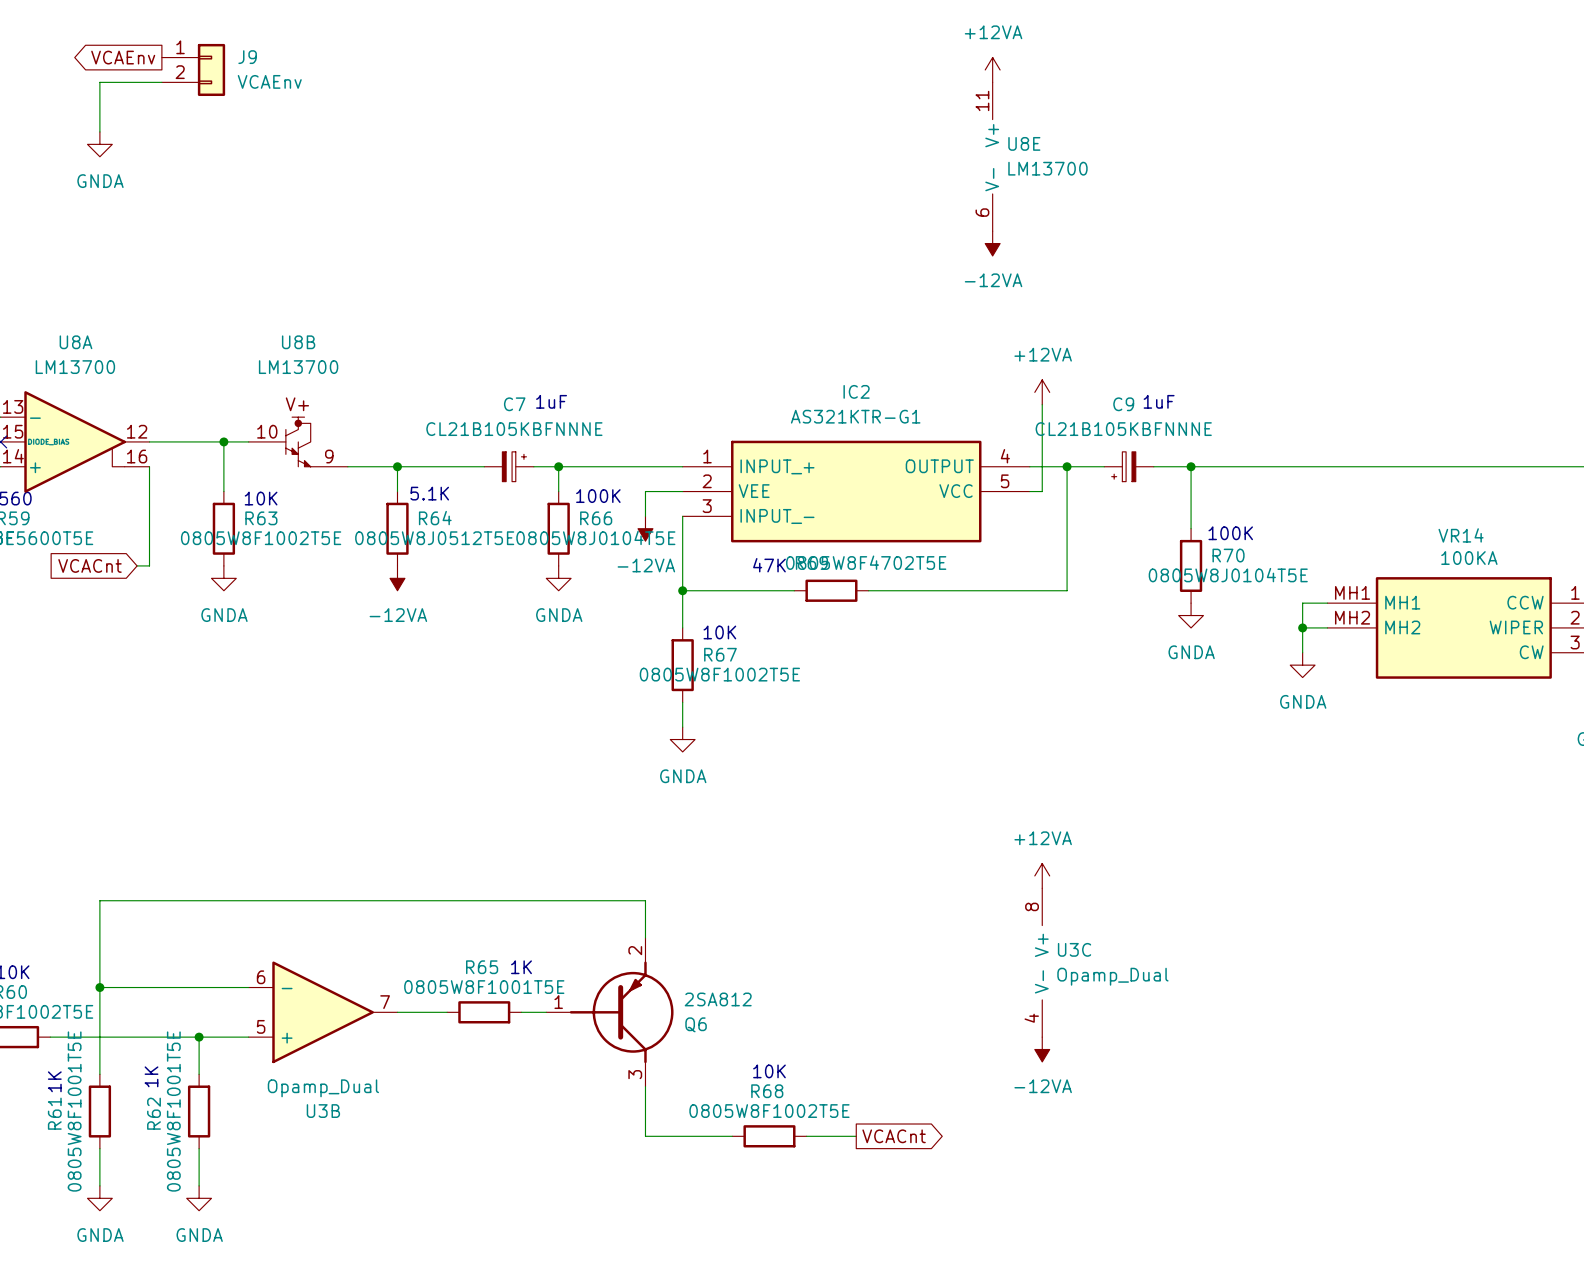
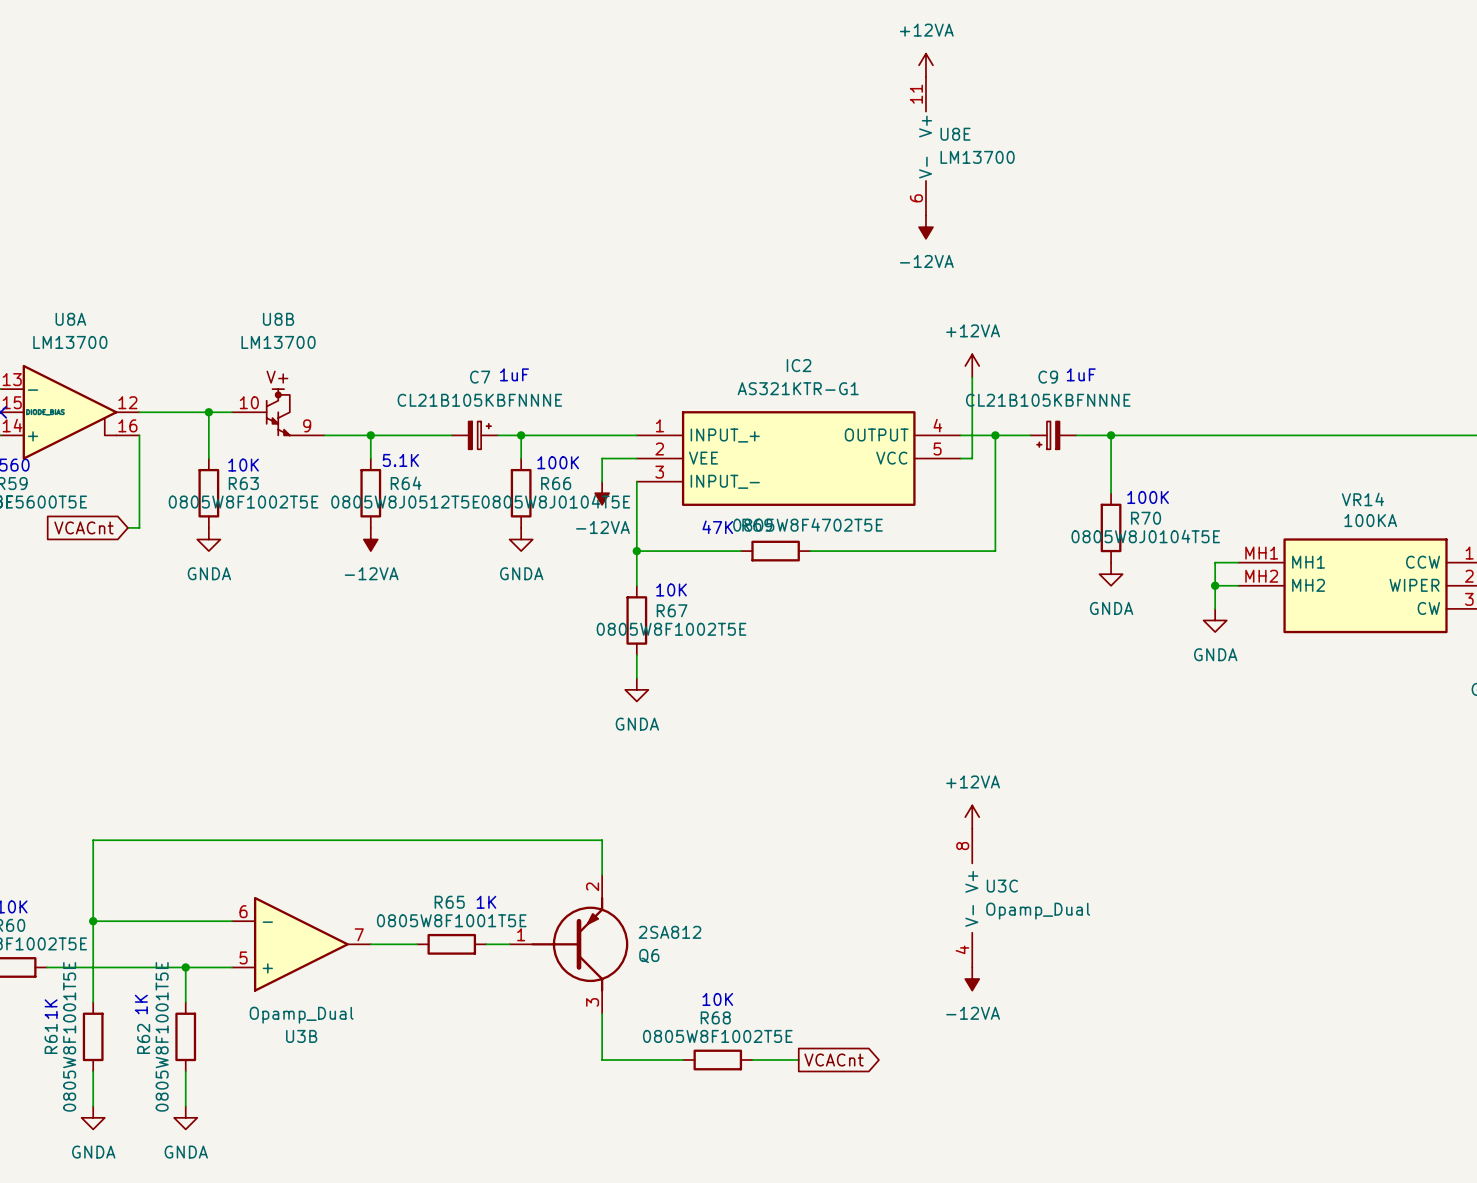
global label: VCAEnv (123, 57) -> none
J9: VCAEnv (193, 69) -> none
wire: (161, 82) (99, 82) (99, 131) -> none
power symbol: GNDA (99, 144) -> none

